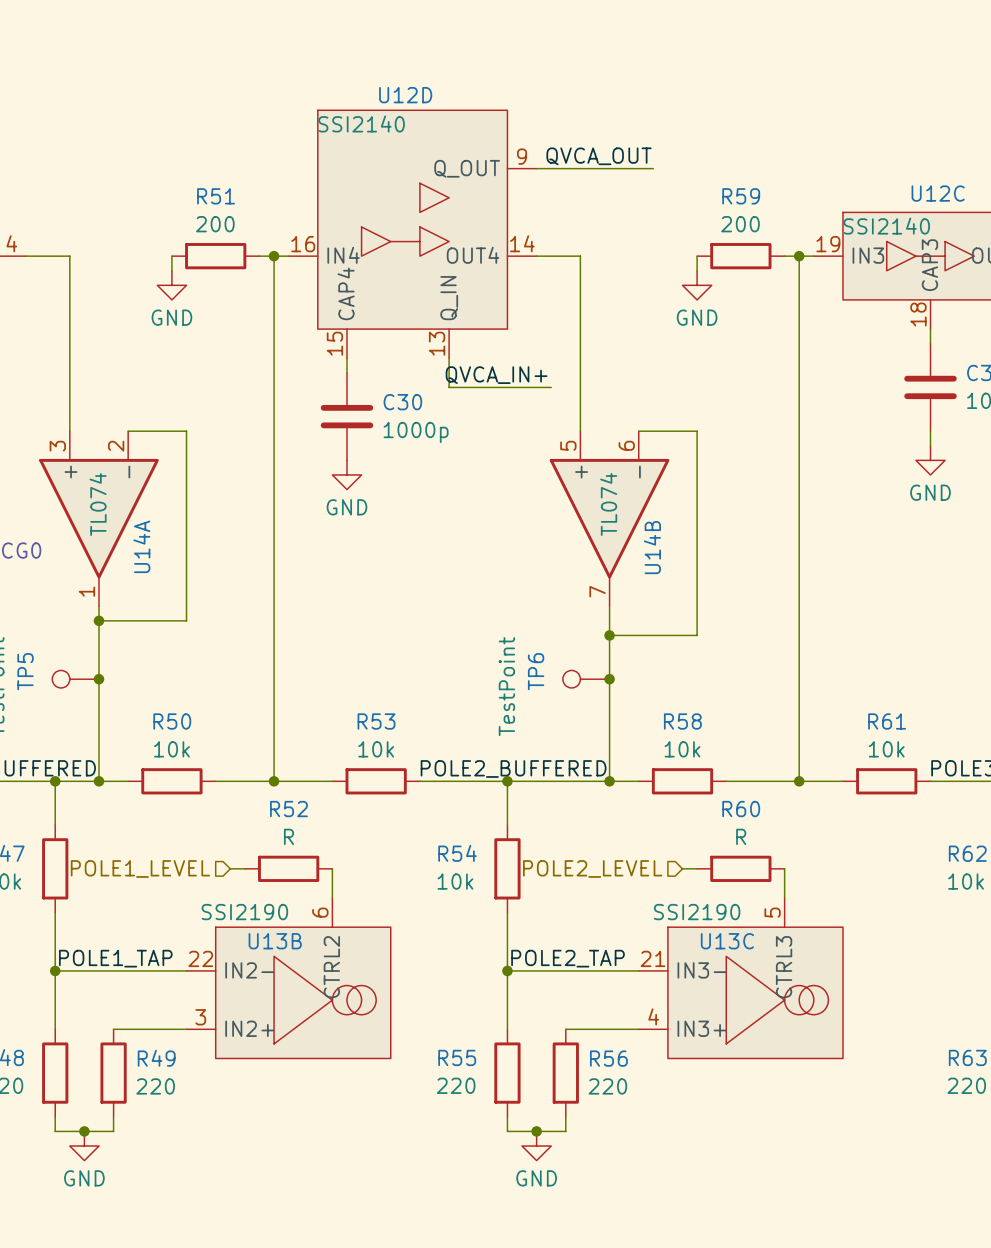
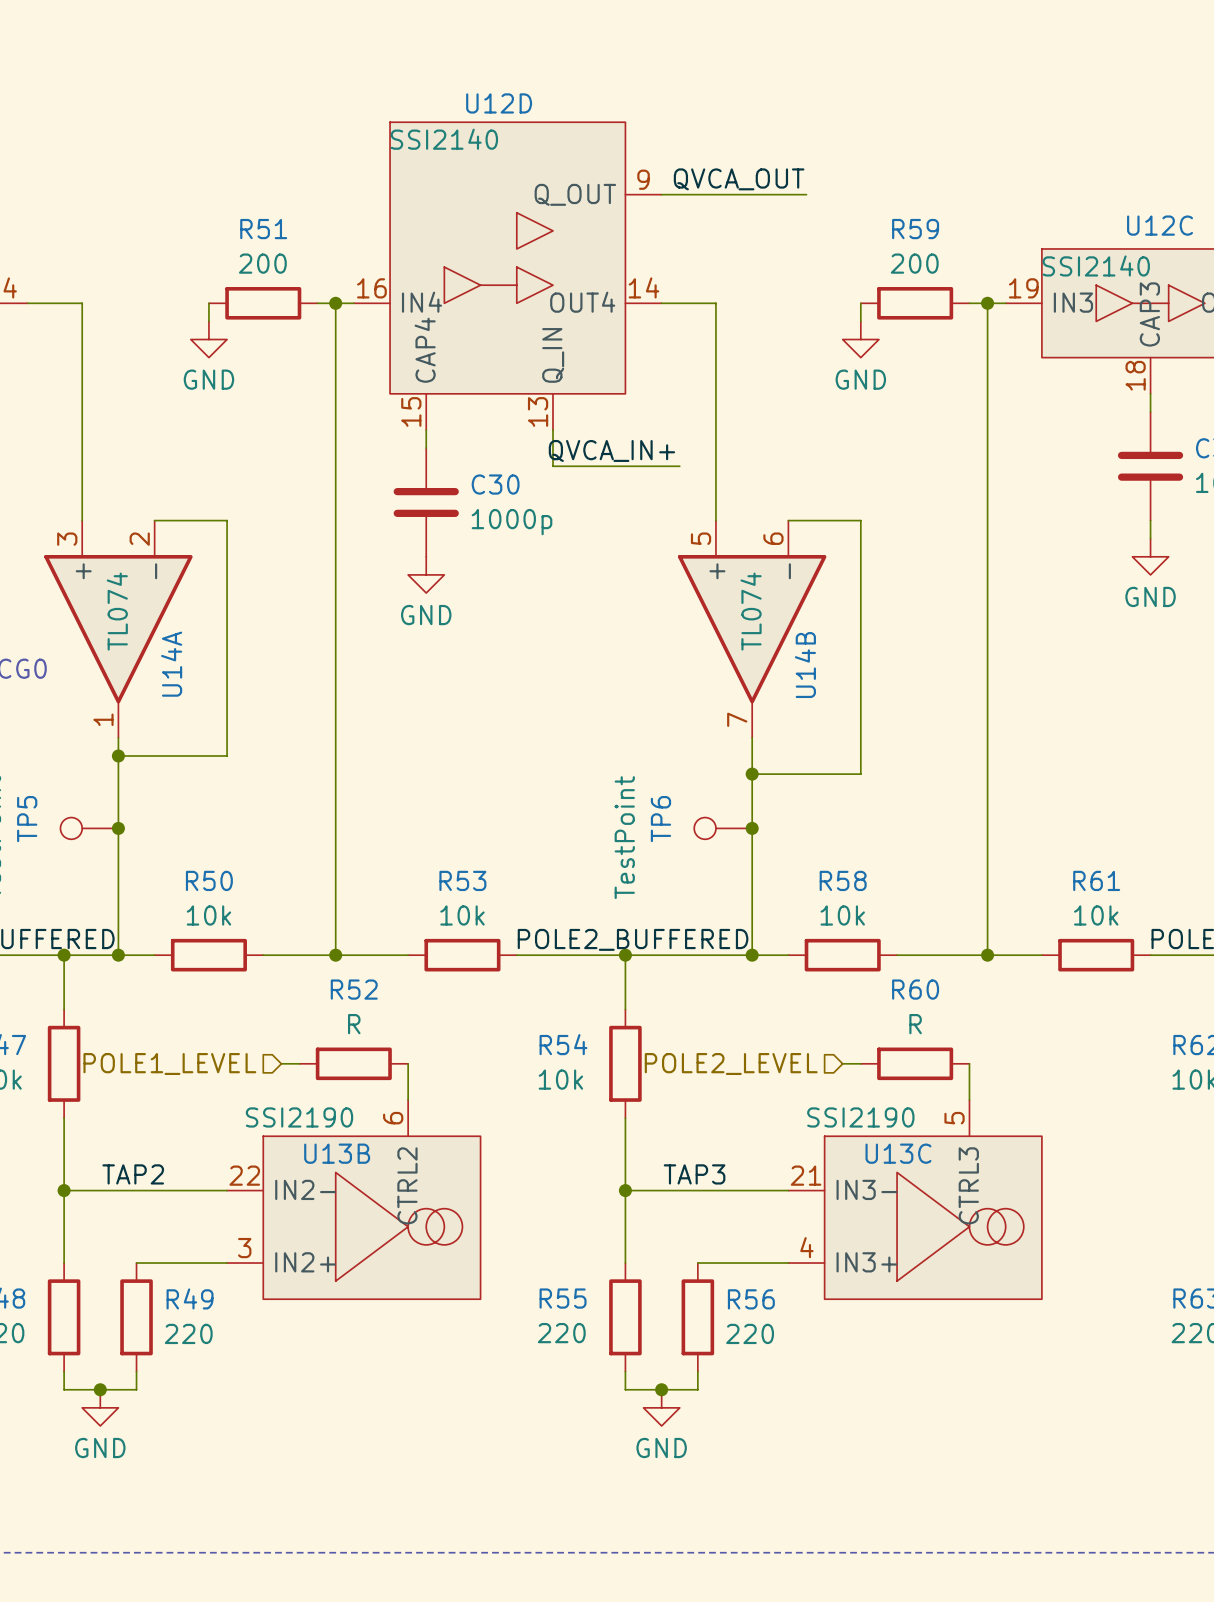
label: none -> TAP2 (133, 1174)
label: none -> TAP3 (694, 1174)
label: POLE1_TAP (115, 958) -> none
label: POLE2_TAP (567, 958) -> none

